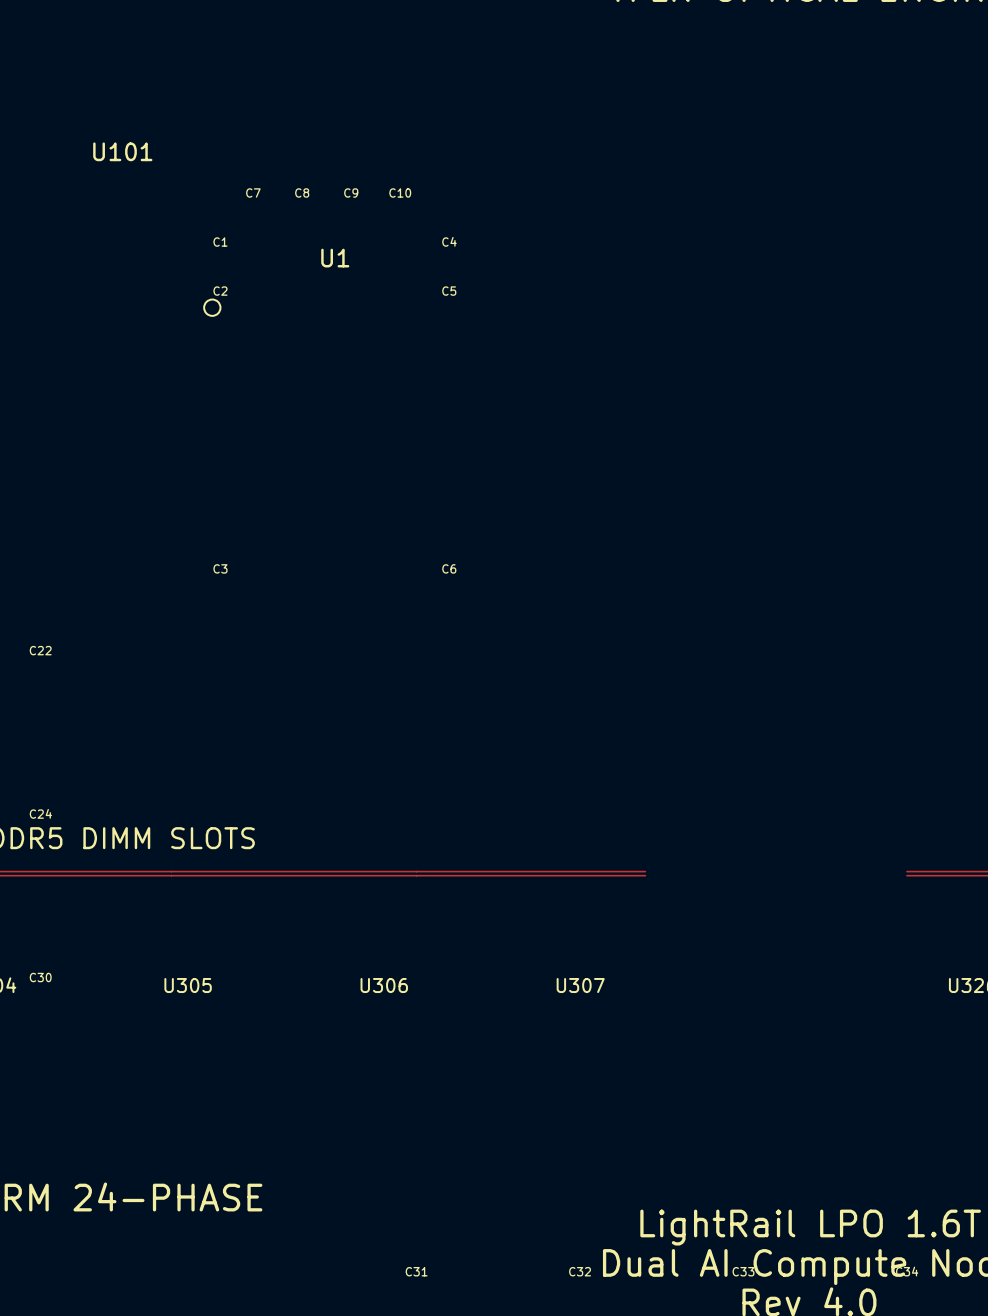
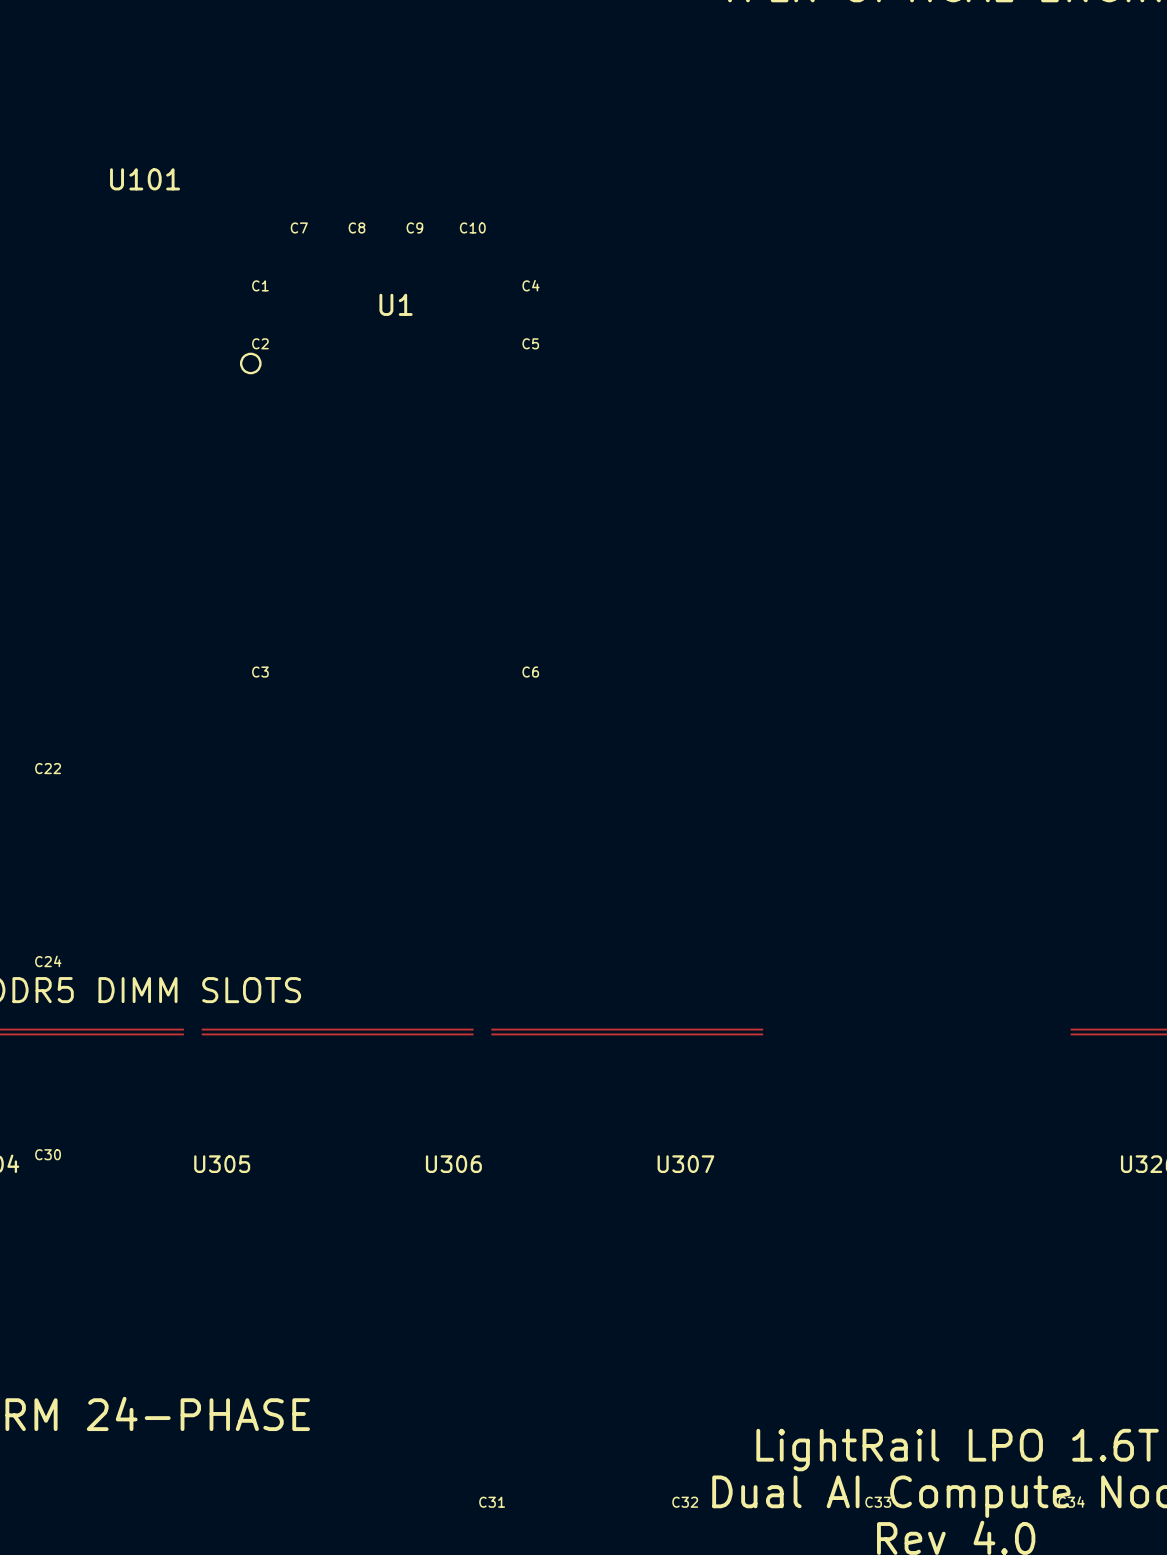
track: (155, 871) (171, 871) -> none
track: (400, 871) (416, 871) -> none
track: (155, 875) (171, 875) -> none
track: (400, 875) (416, 875) -> none

